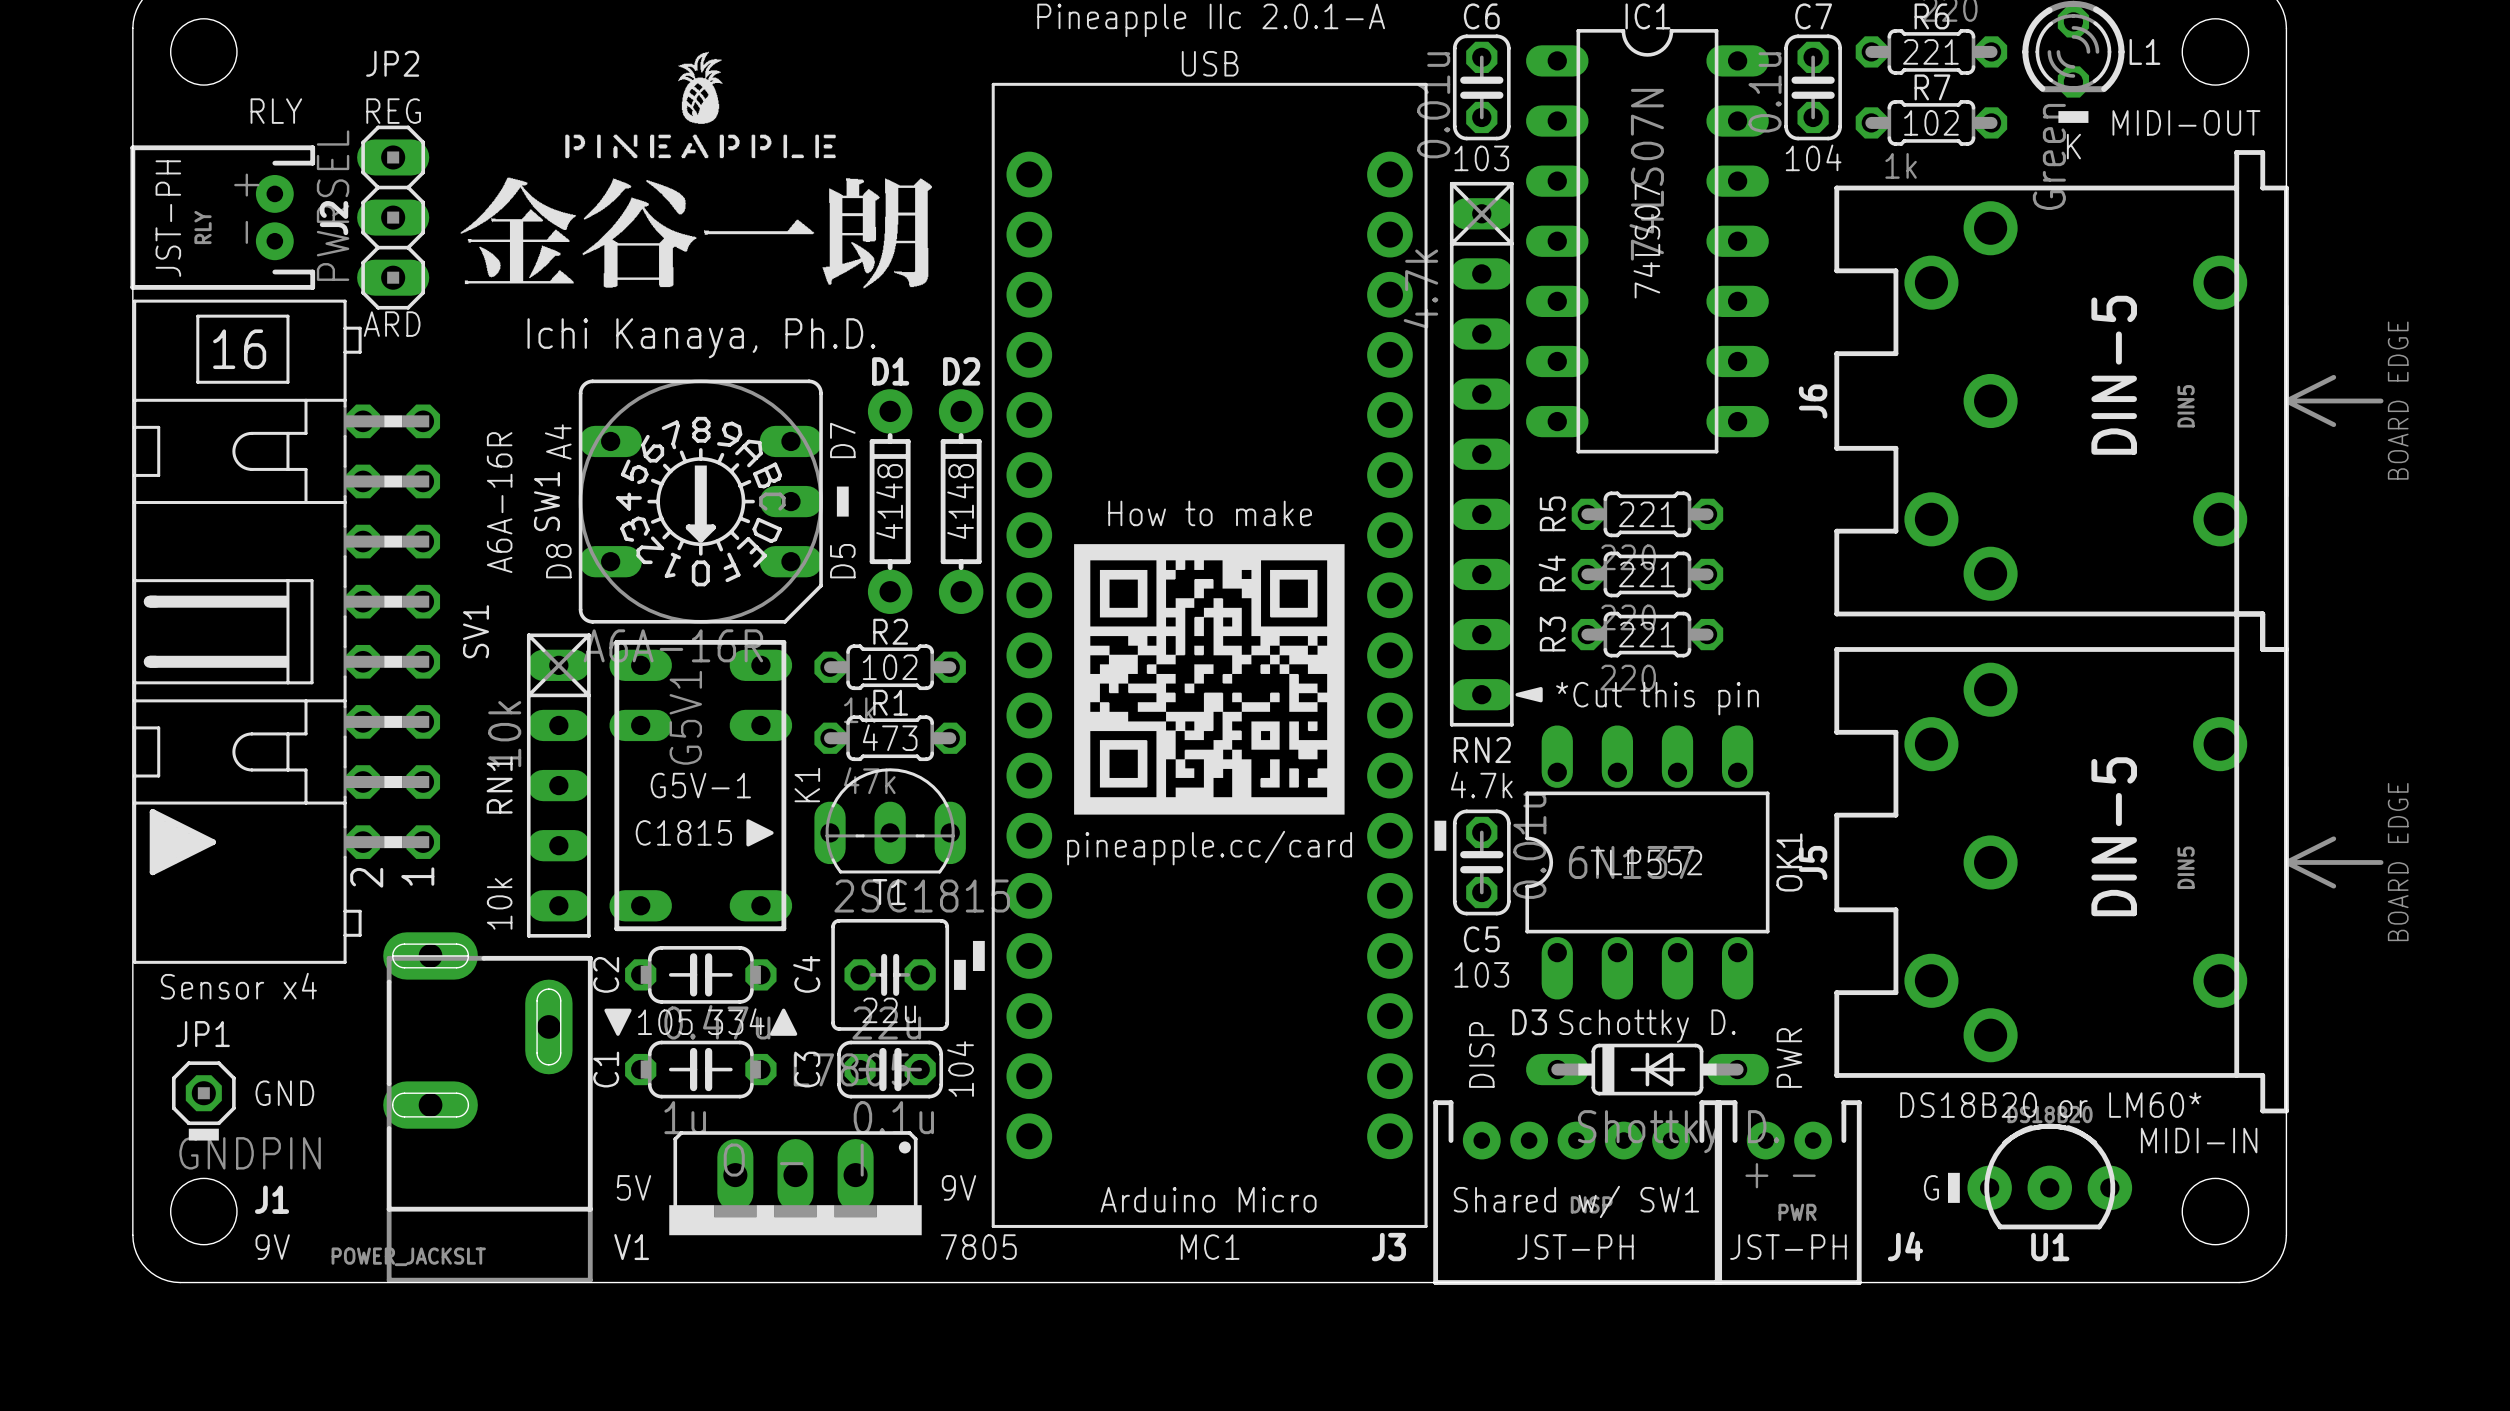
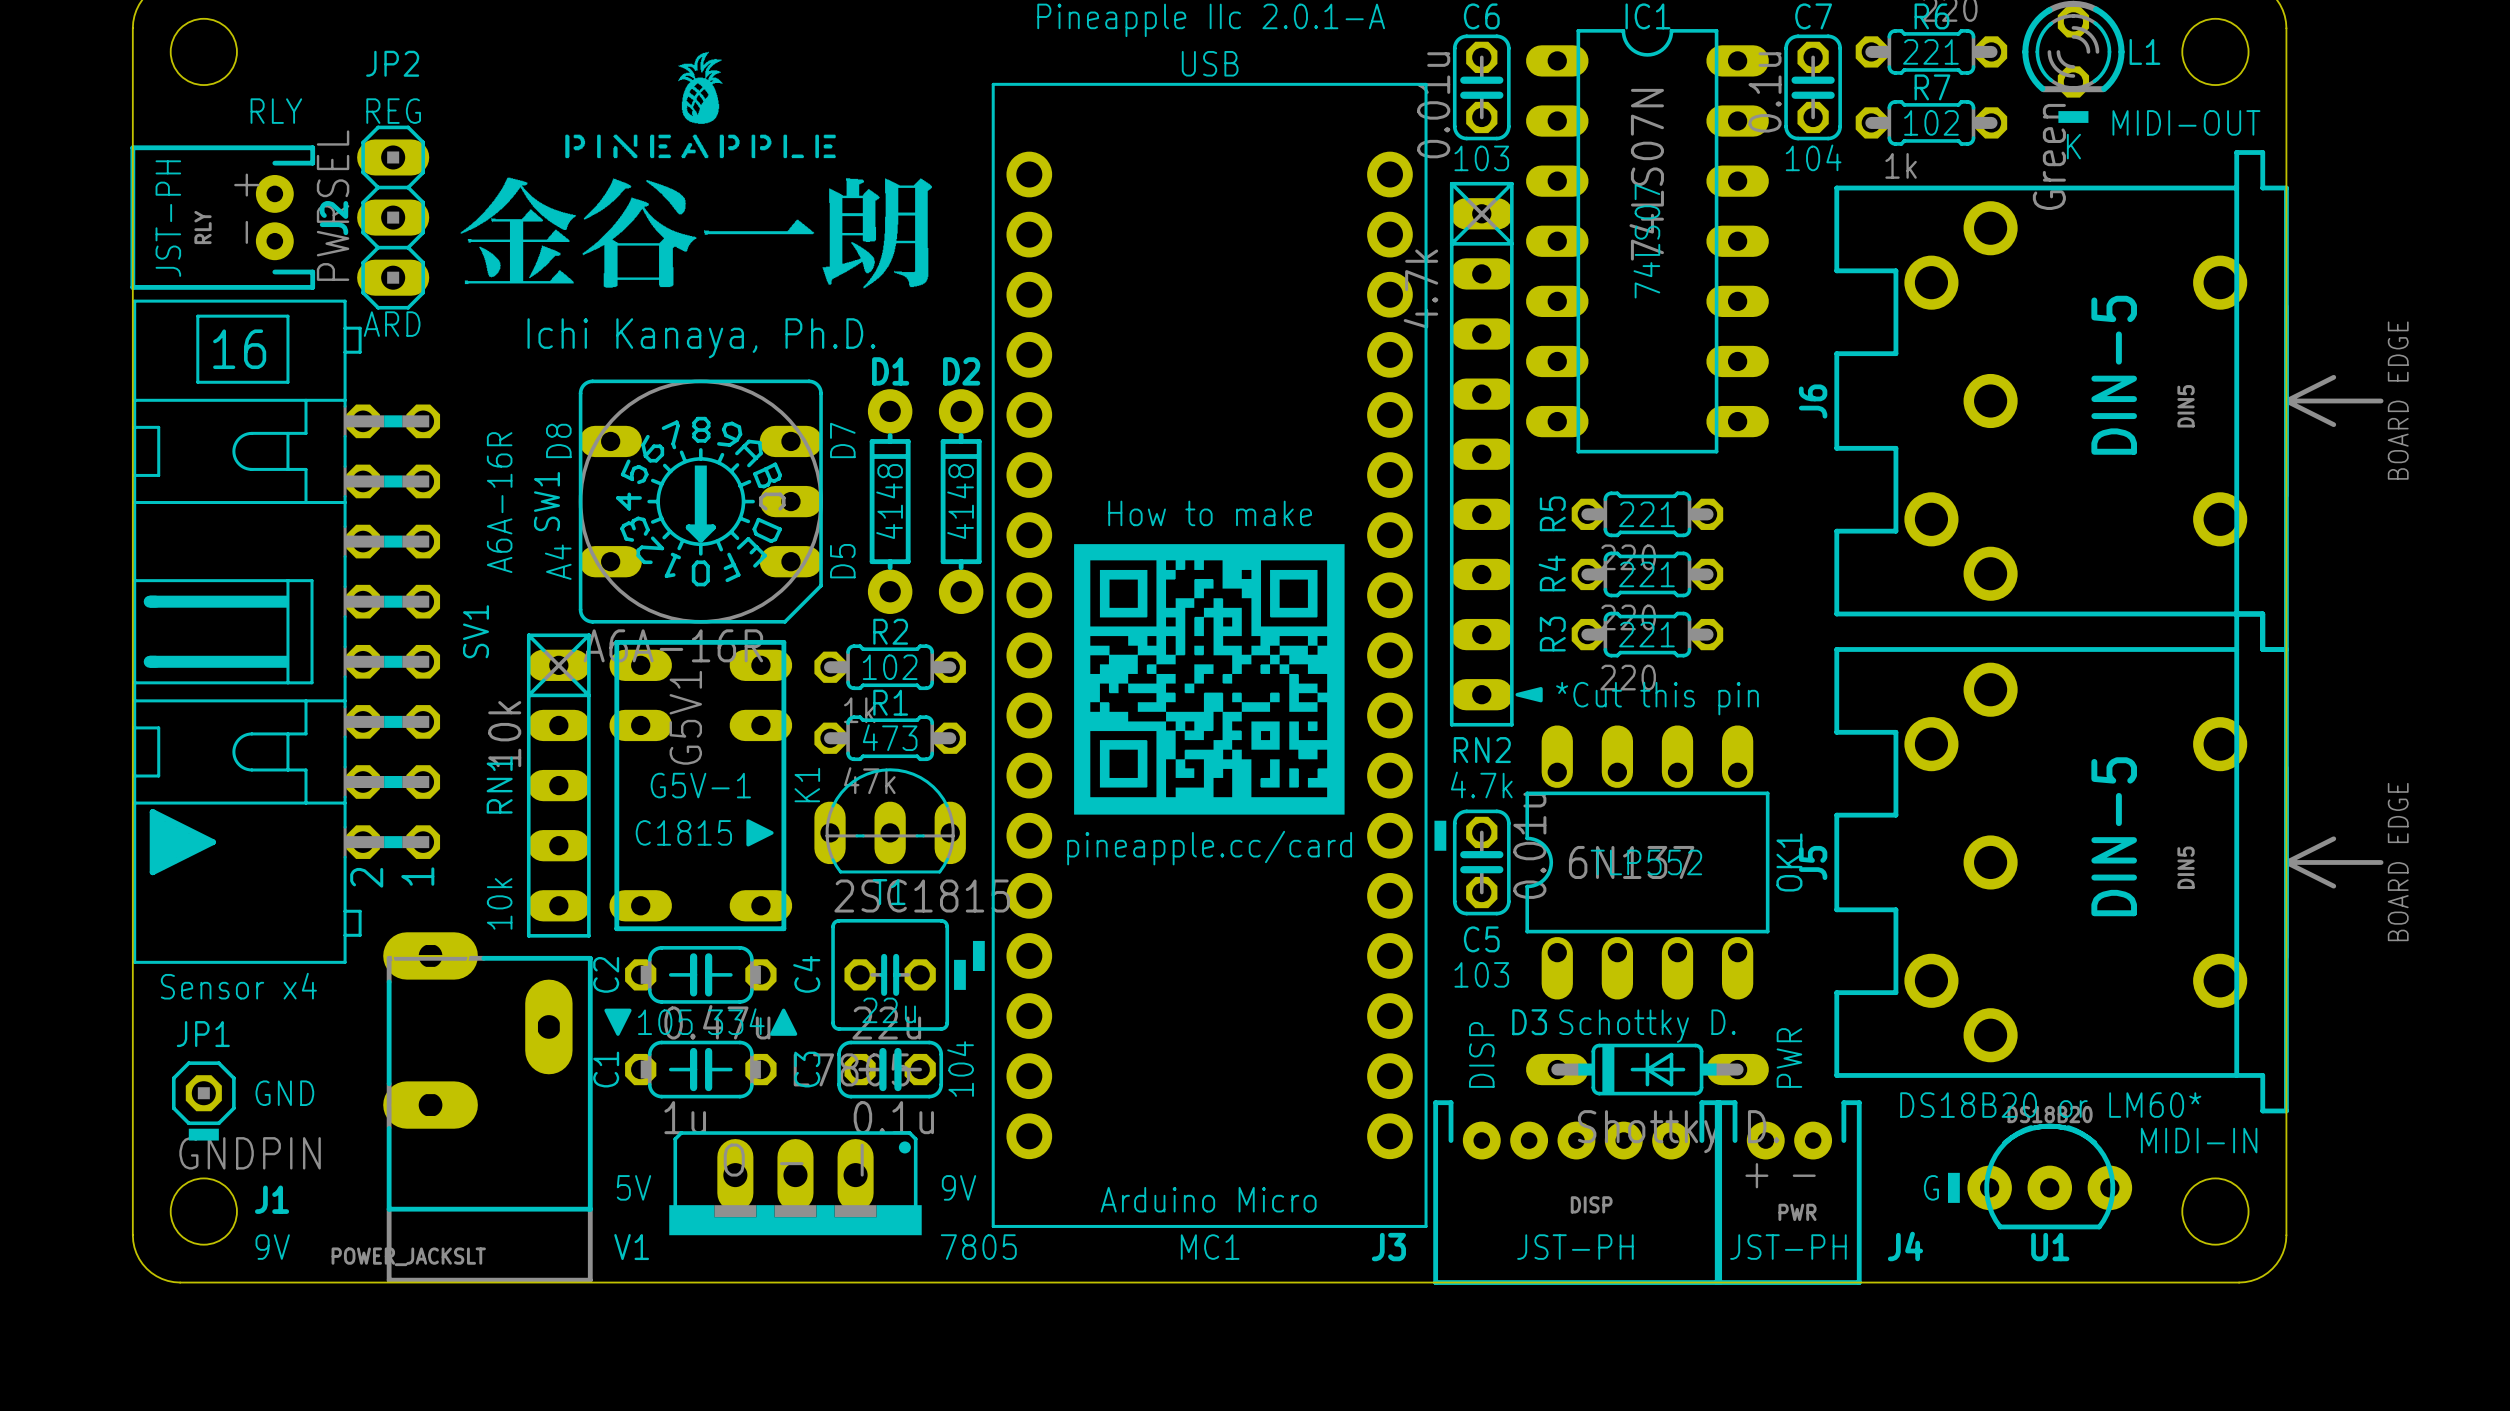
text: A4 (558, 441) -> D8 (558, 440)
drawing: [836, 486, 849, 517] -> none
text: D8 (558, 561) -> A4 (558, 562)
text: Shared w/ SW1 (1576, 1201) -> none

